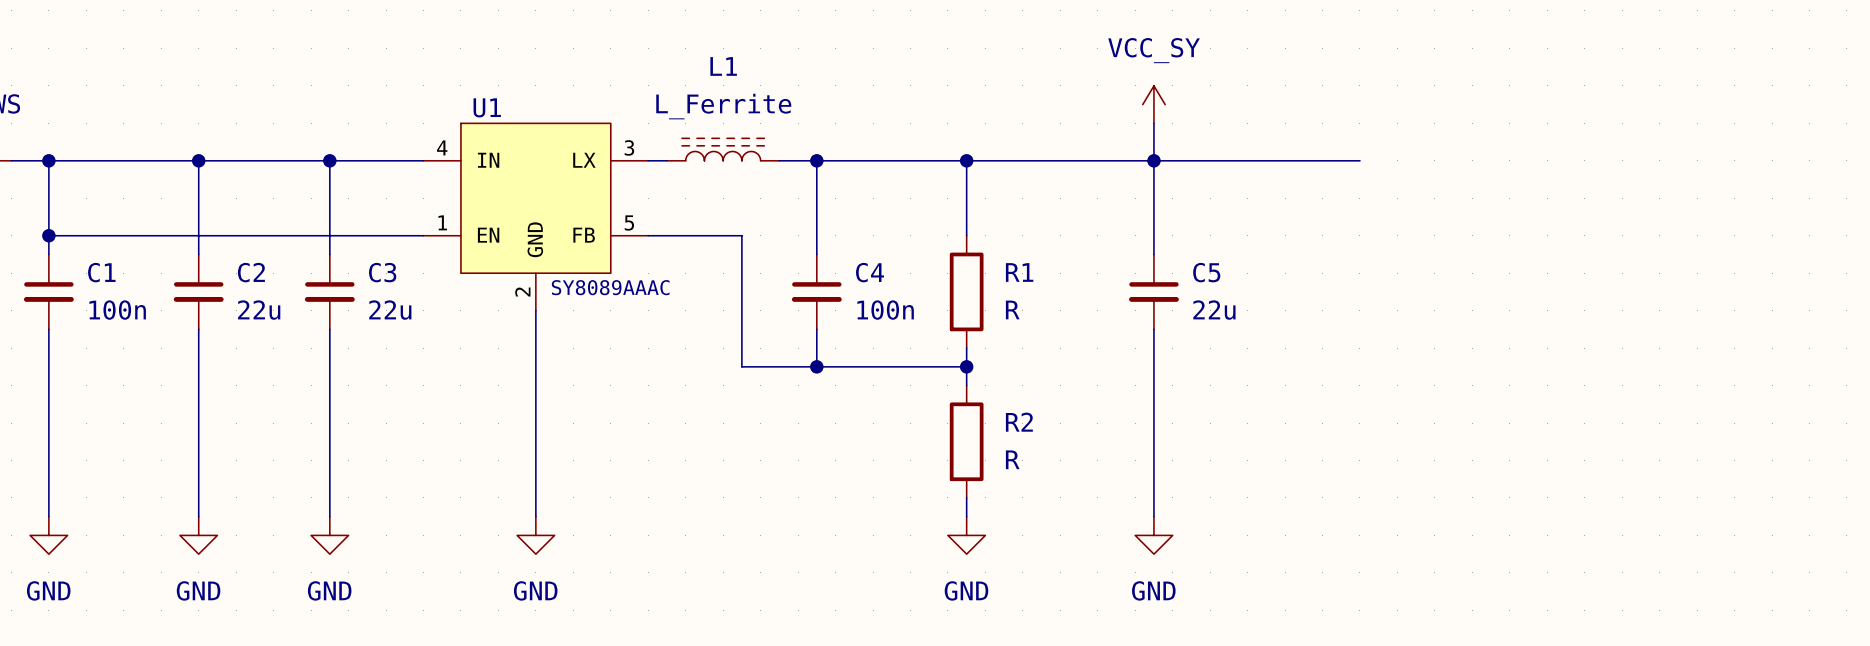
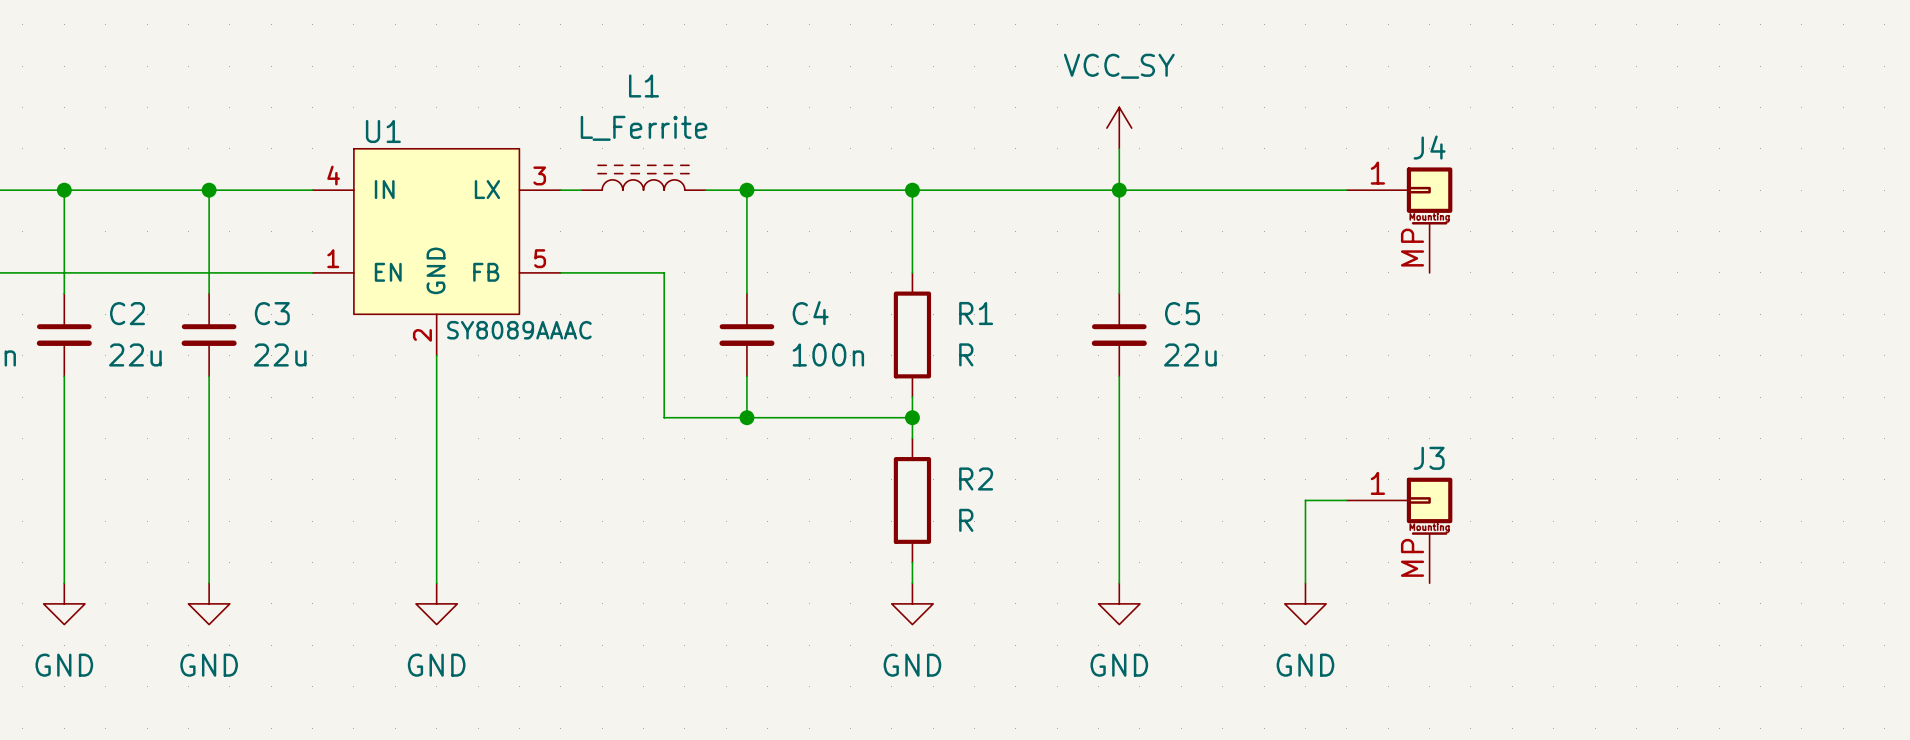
J4: none -> (1399, 220)
wire: none -> (1346, 500) (1305, 500) (1305, 583)
J3: none -> (1399, 530)
power symbol: none -> GND (1305, 603)

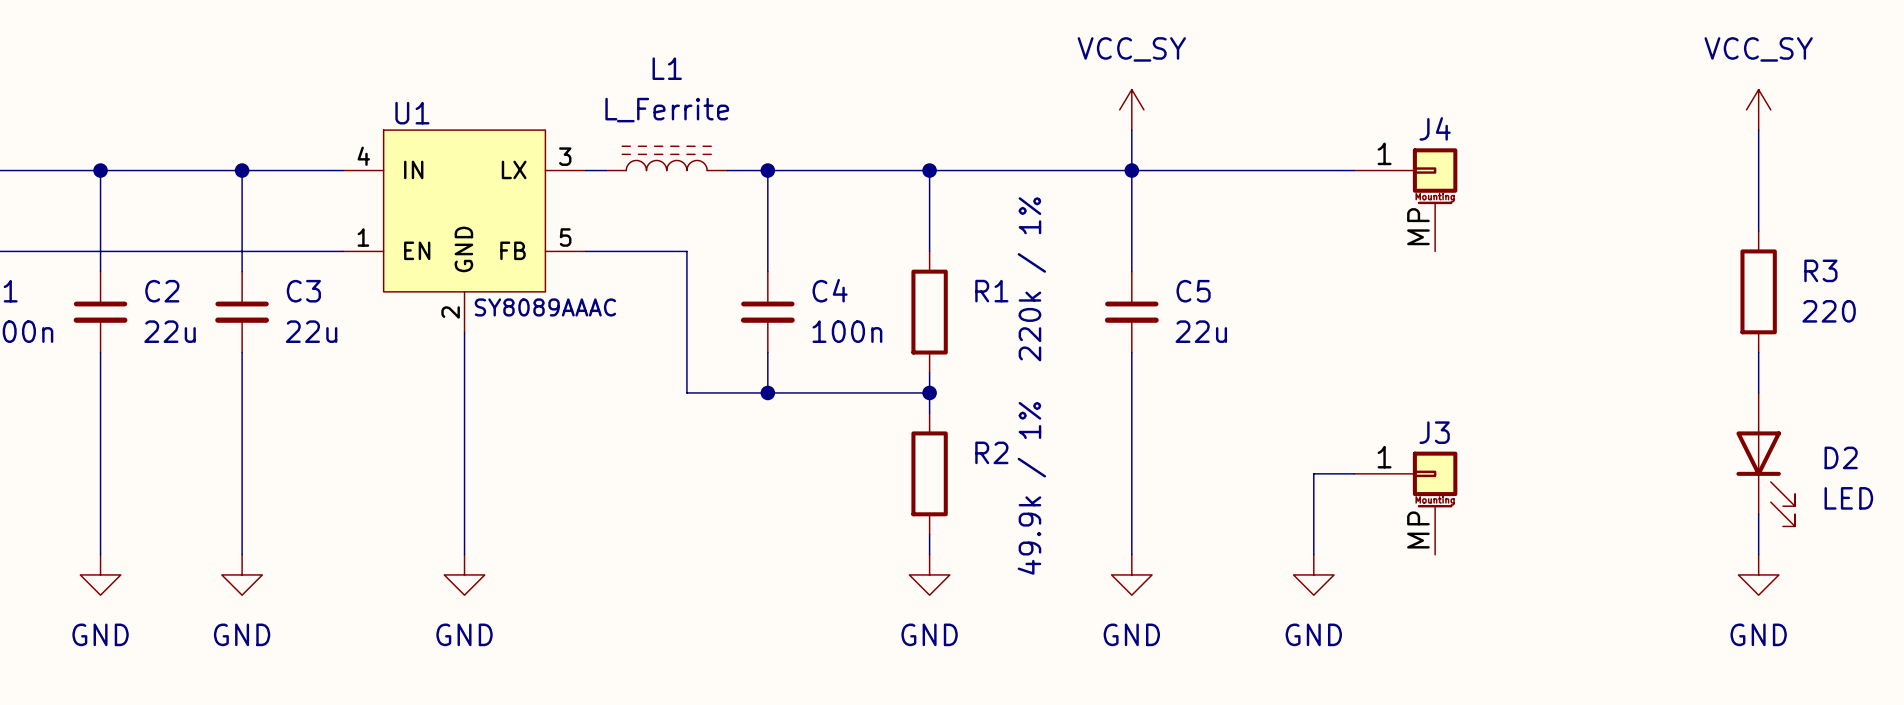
power symbol: none -> VCC_SY (1758, 109)
wire: none -> (1758, 130) (1758, 231)
R3: none -> 220 (1758, 291)
R1 value: R (966, 354) -> 220k / 1% (1031, 279)
wire: none -> (1758, 352) (1758, 392)
D2: none -> LED (1765, 459)
R2 value: R (966, 520) -> 49.9k / 1% (1031, 488)
wire: none -> (1758, 514) (1758, 554)
power symbol: none -> GND (1758, 574)

